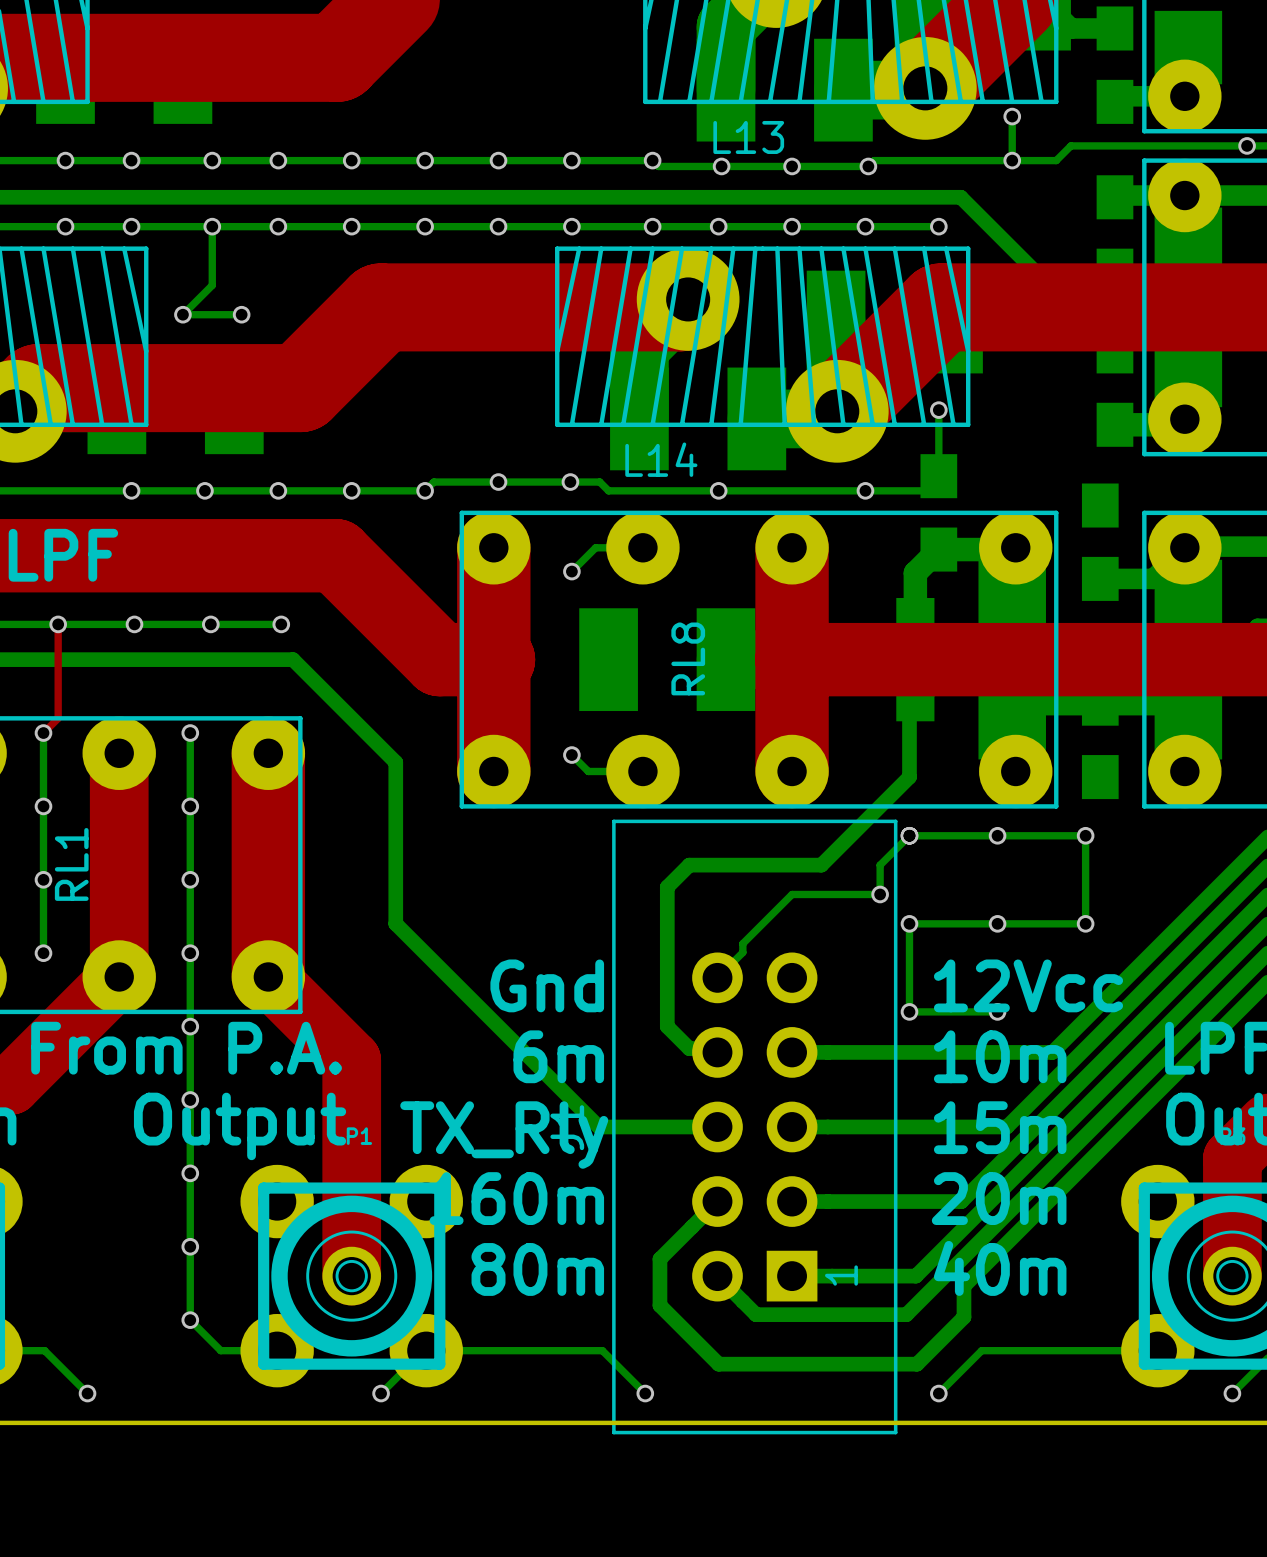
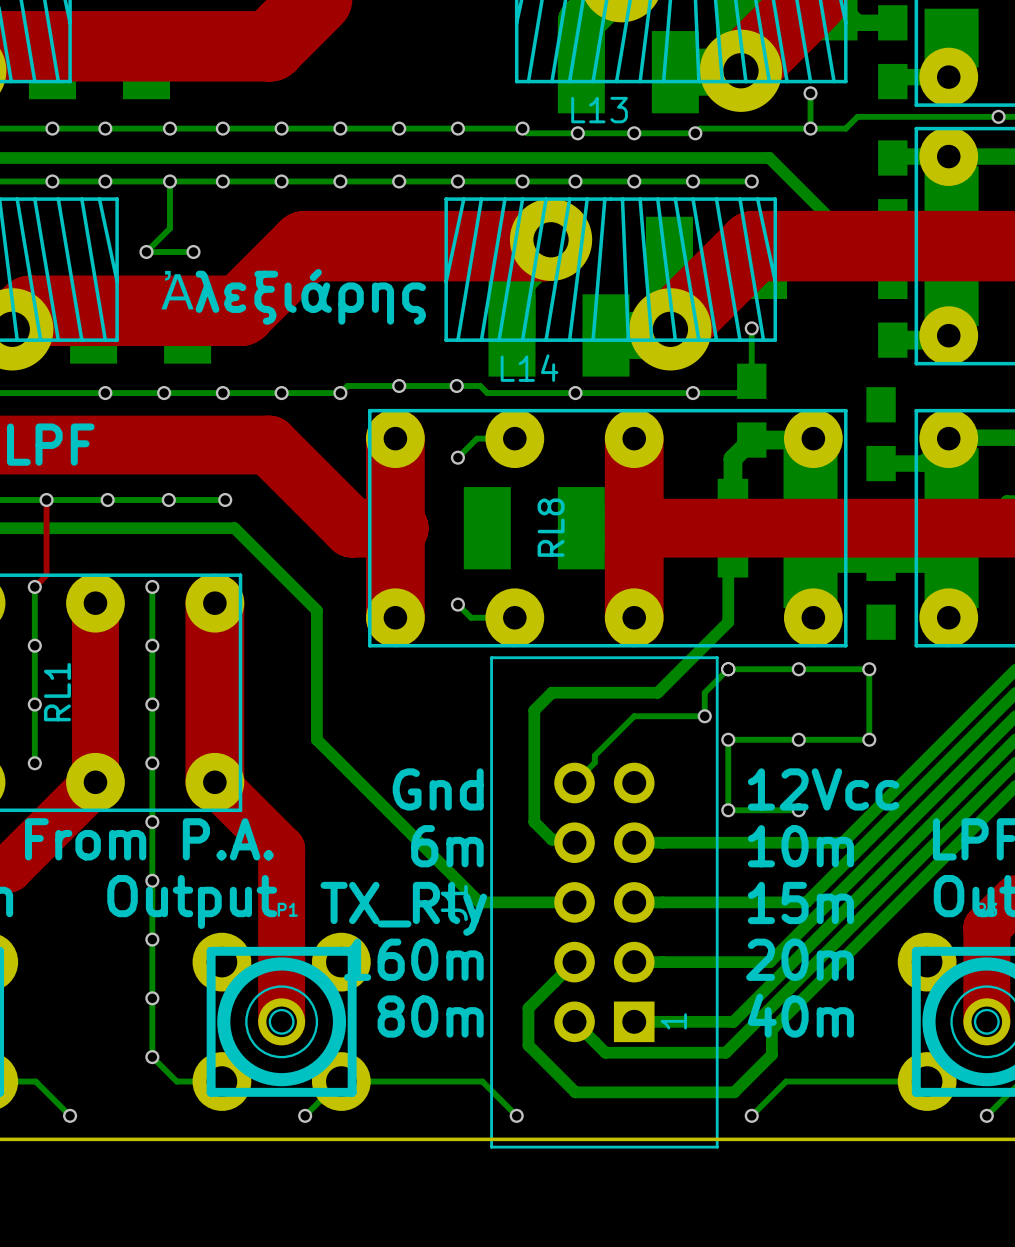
text: none -> Ἀλεξιάρης (291, 296)

